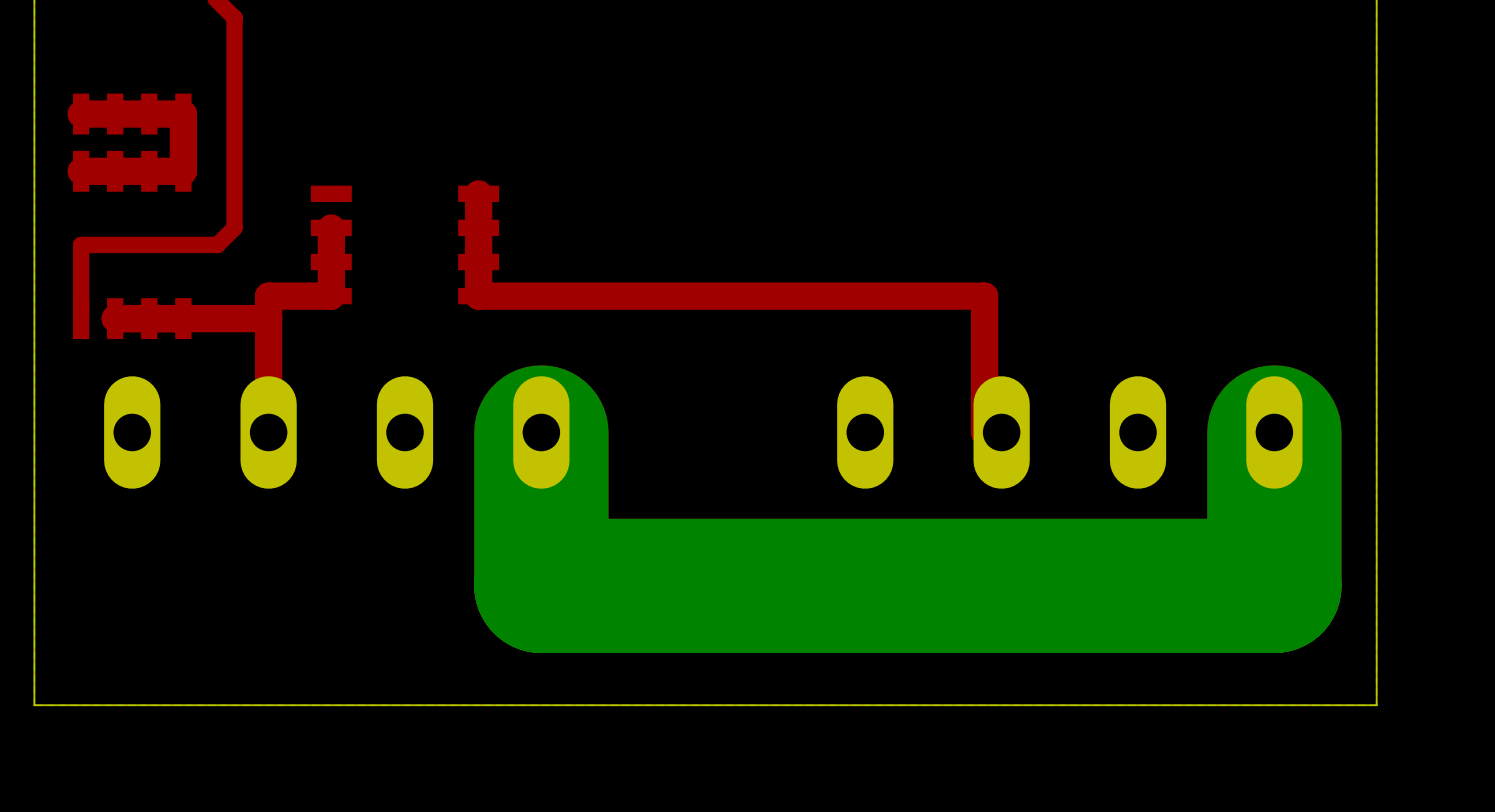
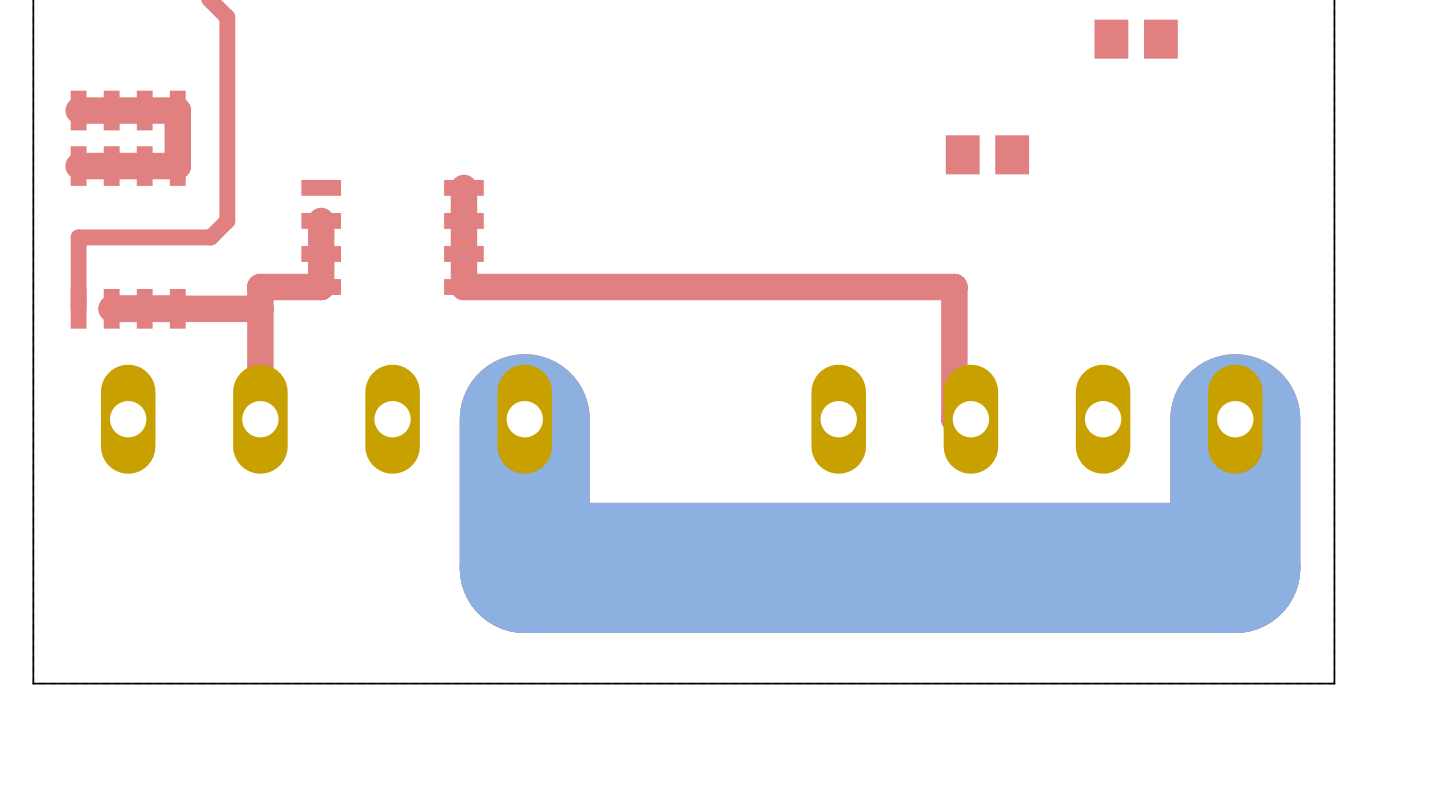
part: none -> (1136, 39)
part: none -> (987, 154)

